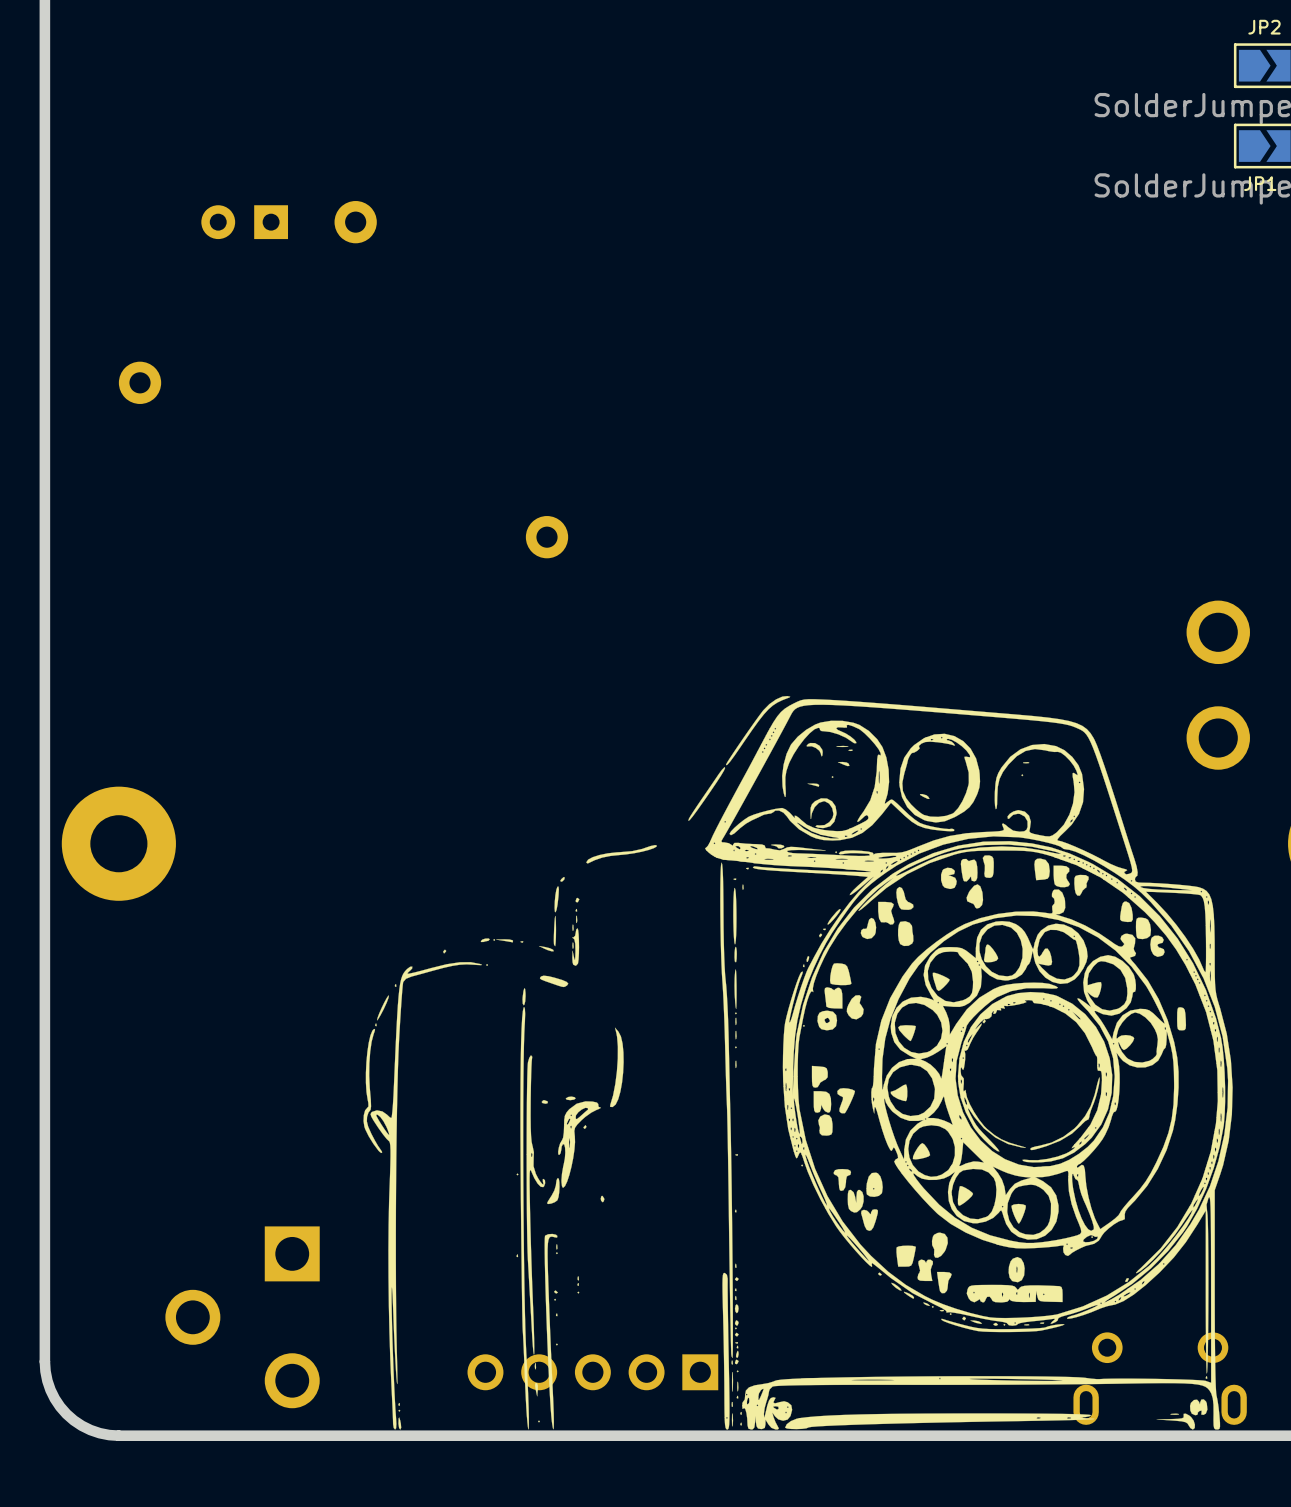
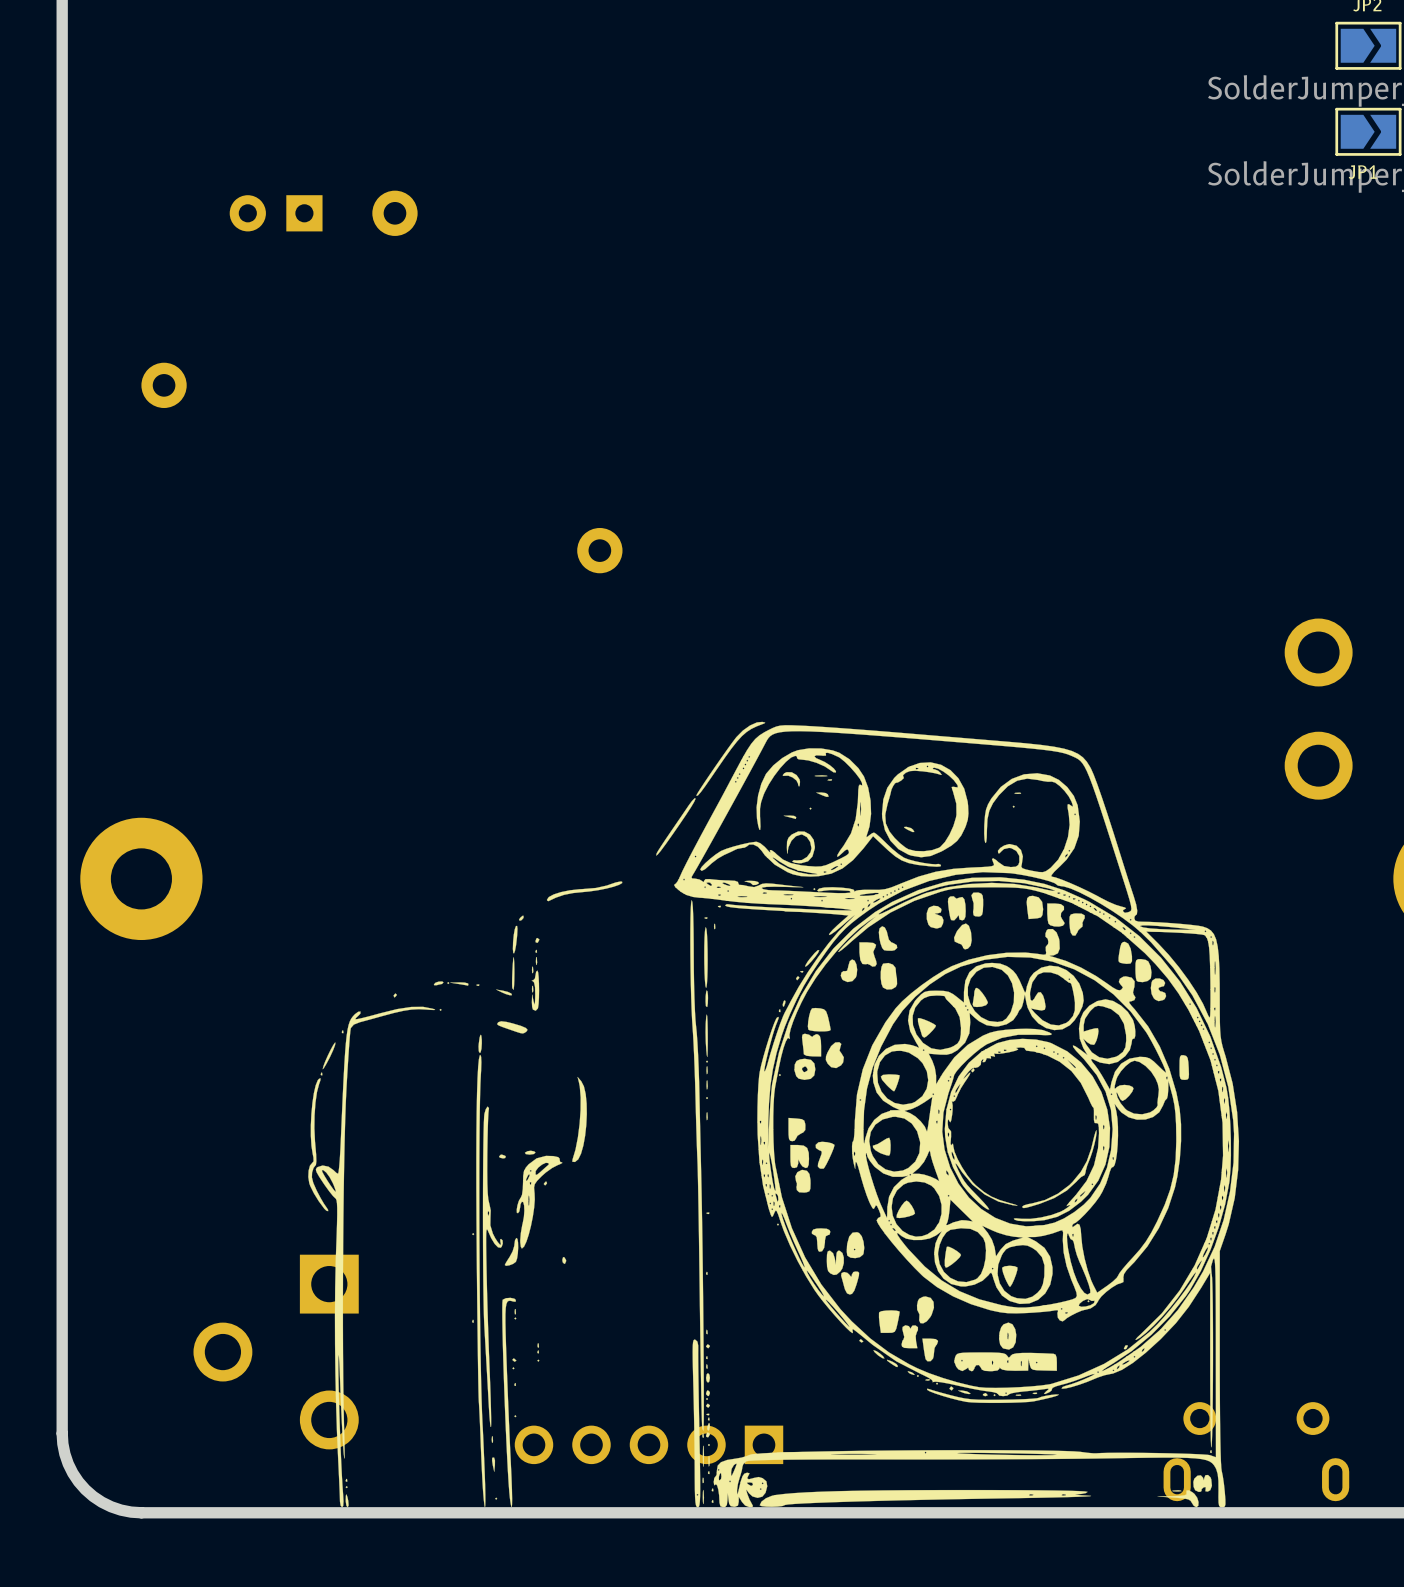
drawing position: (798, 1062) -> (773, 1114)
part position: (242, 1317) -> (276, 1352)

